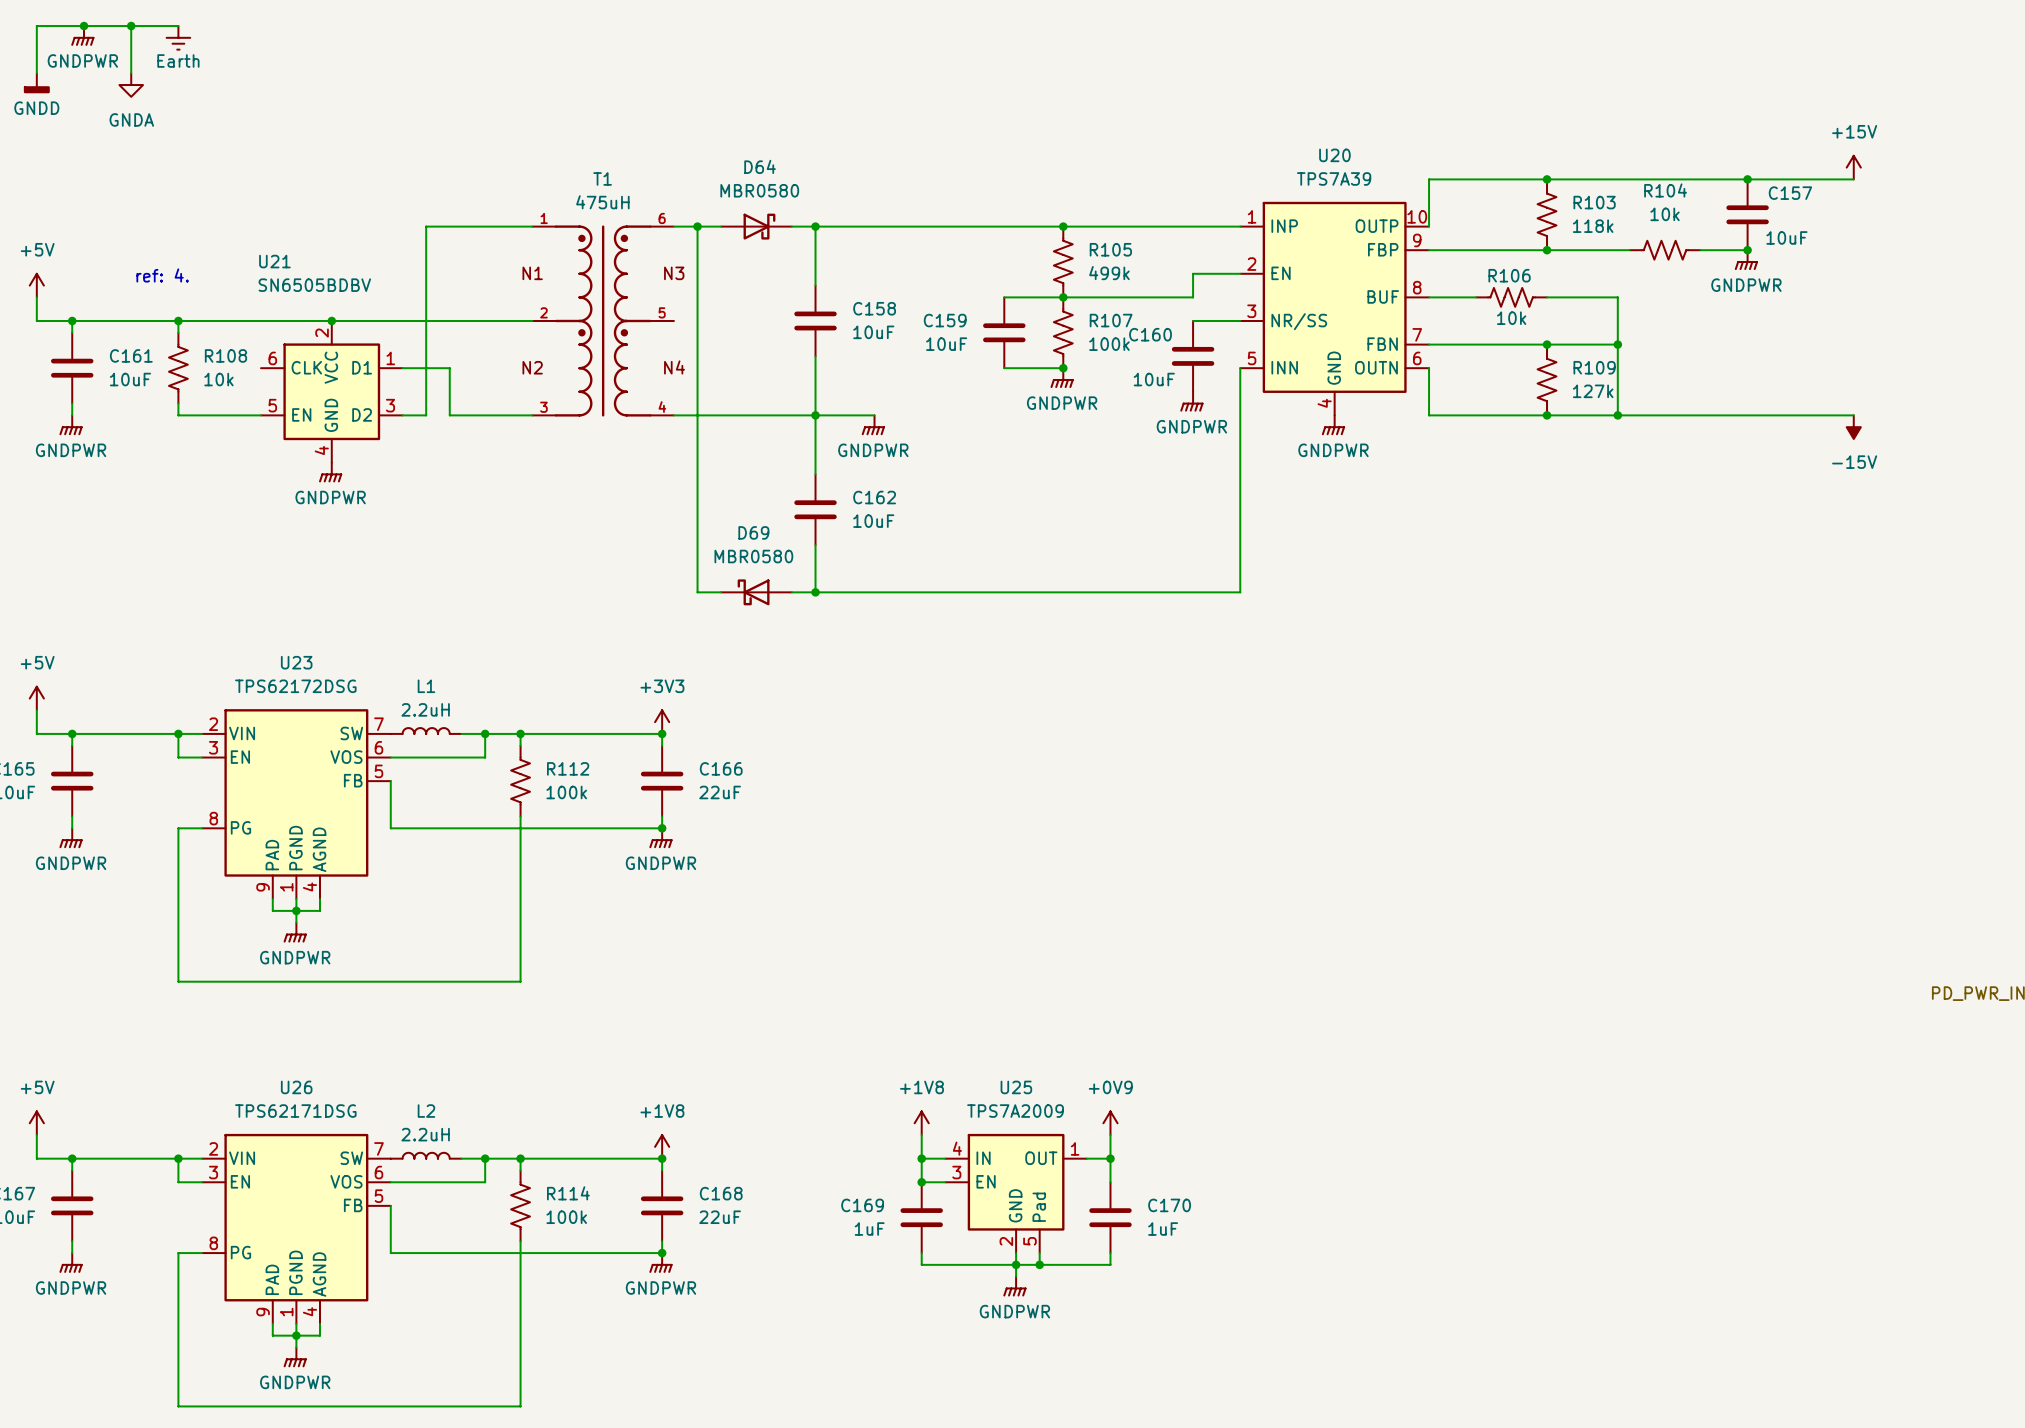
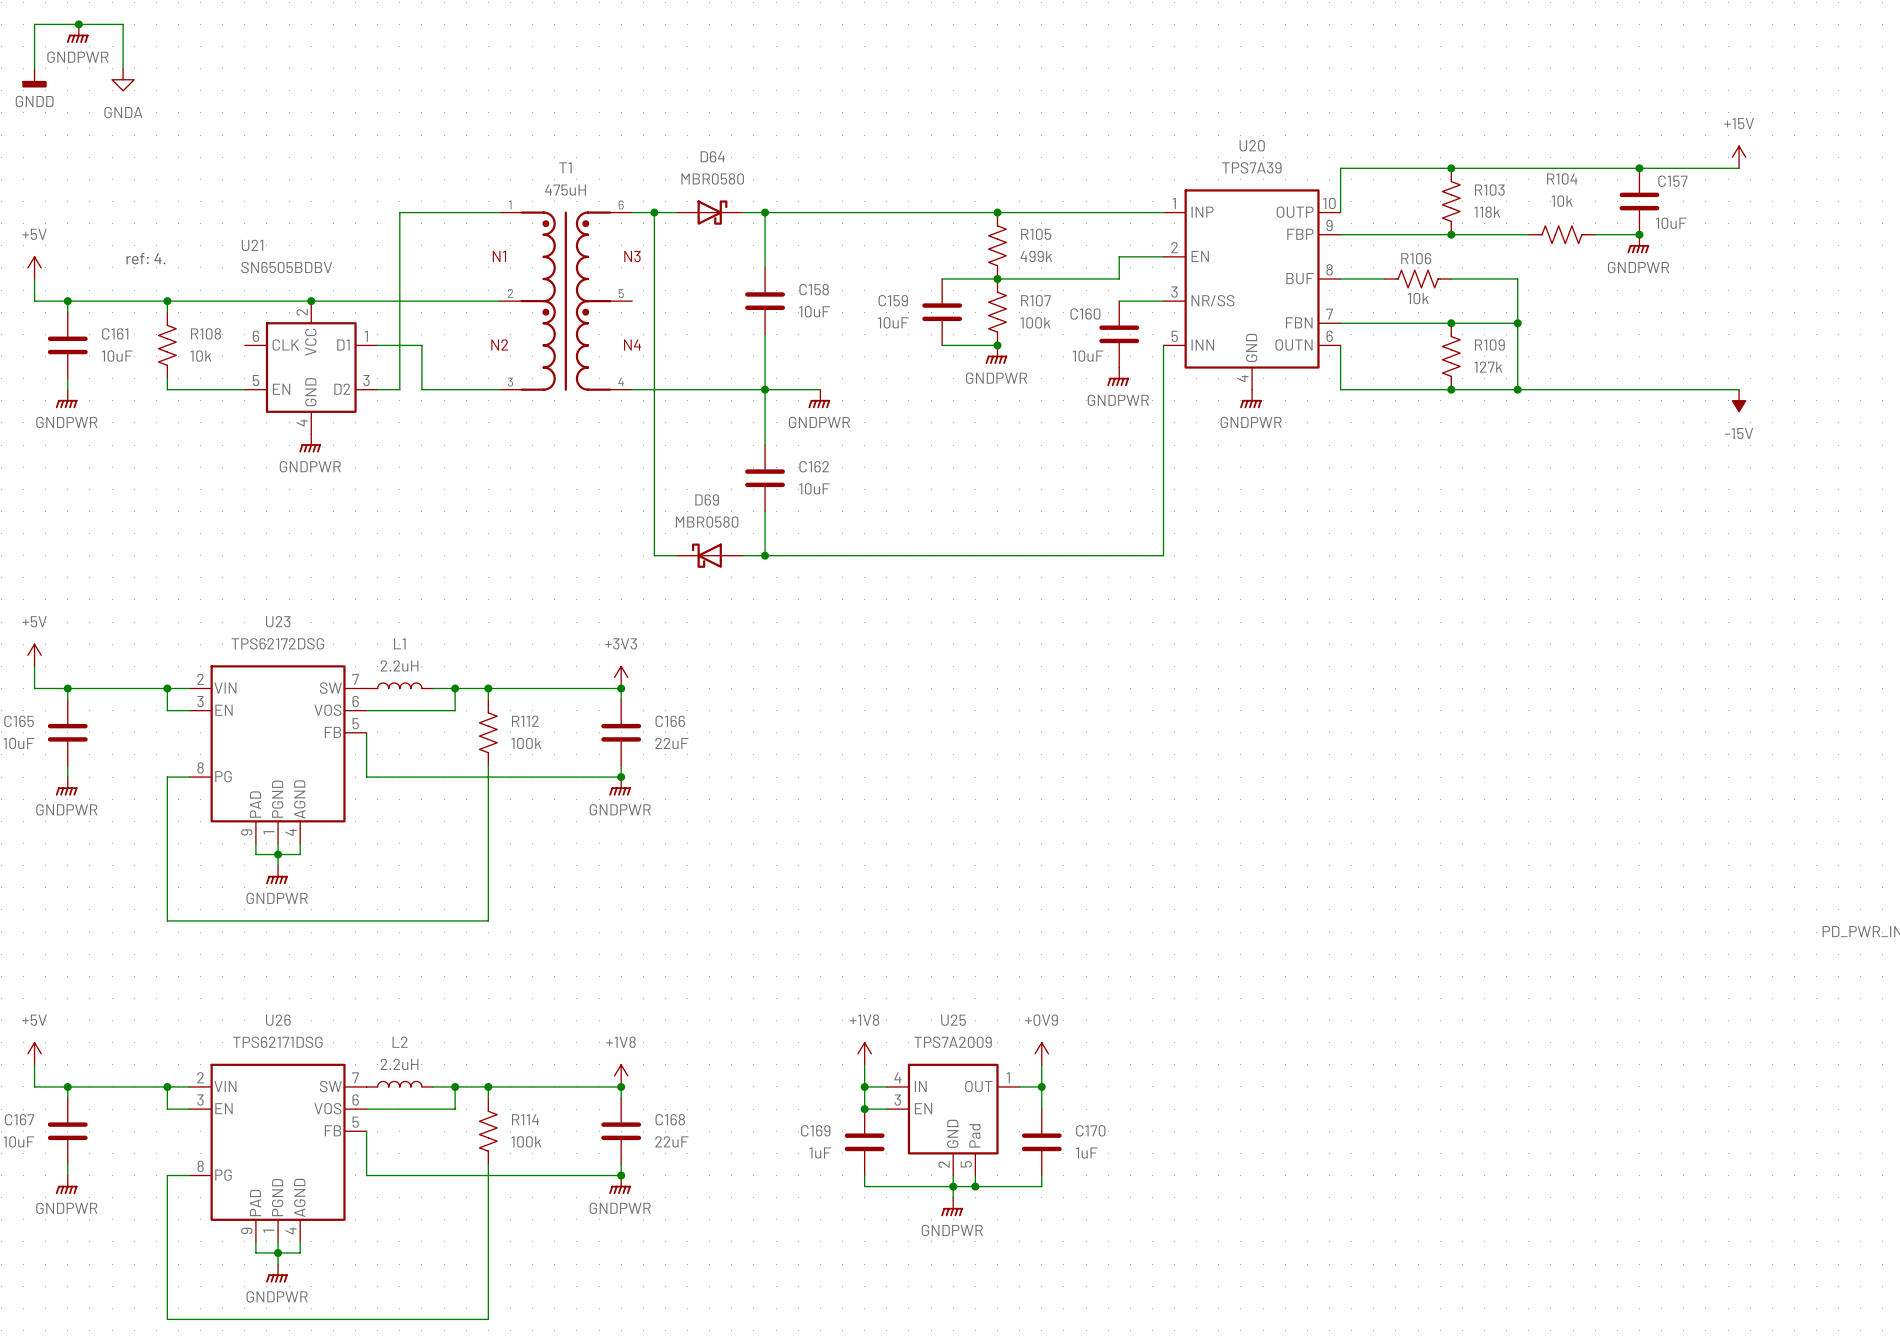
wire: (131, 26) (178, 26) -> none
junction: (131, 26) -> none
power symbol: Earth (178, 37) -> none

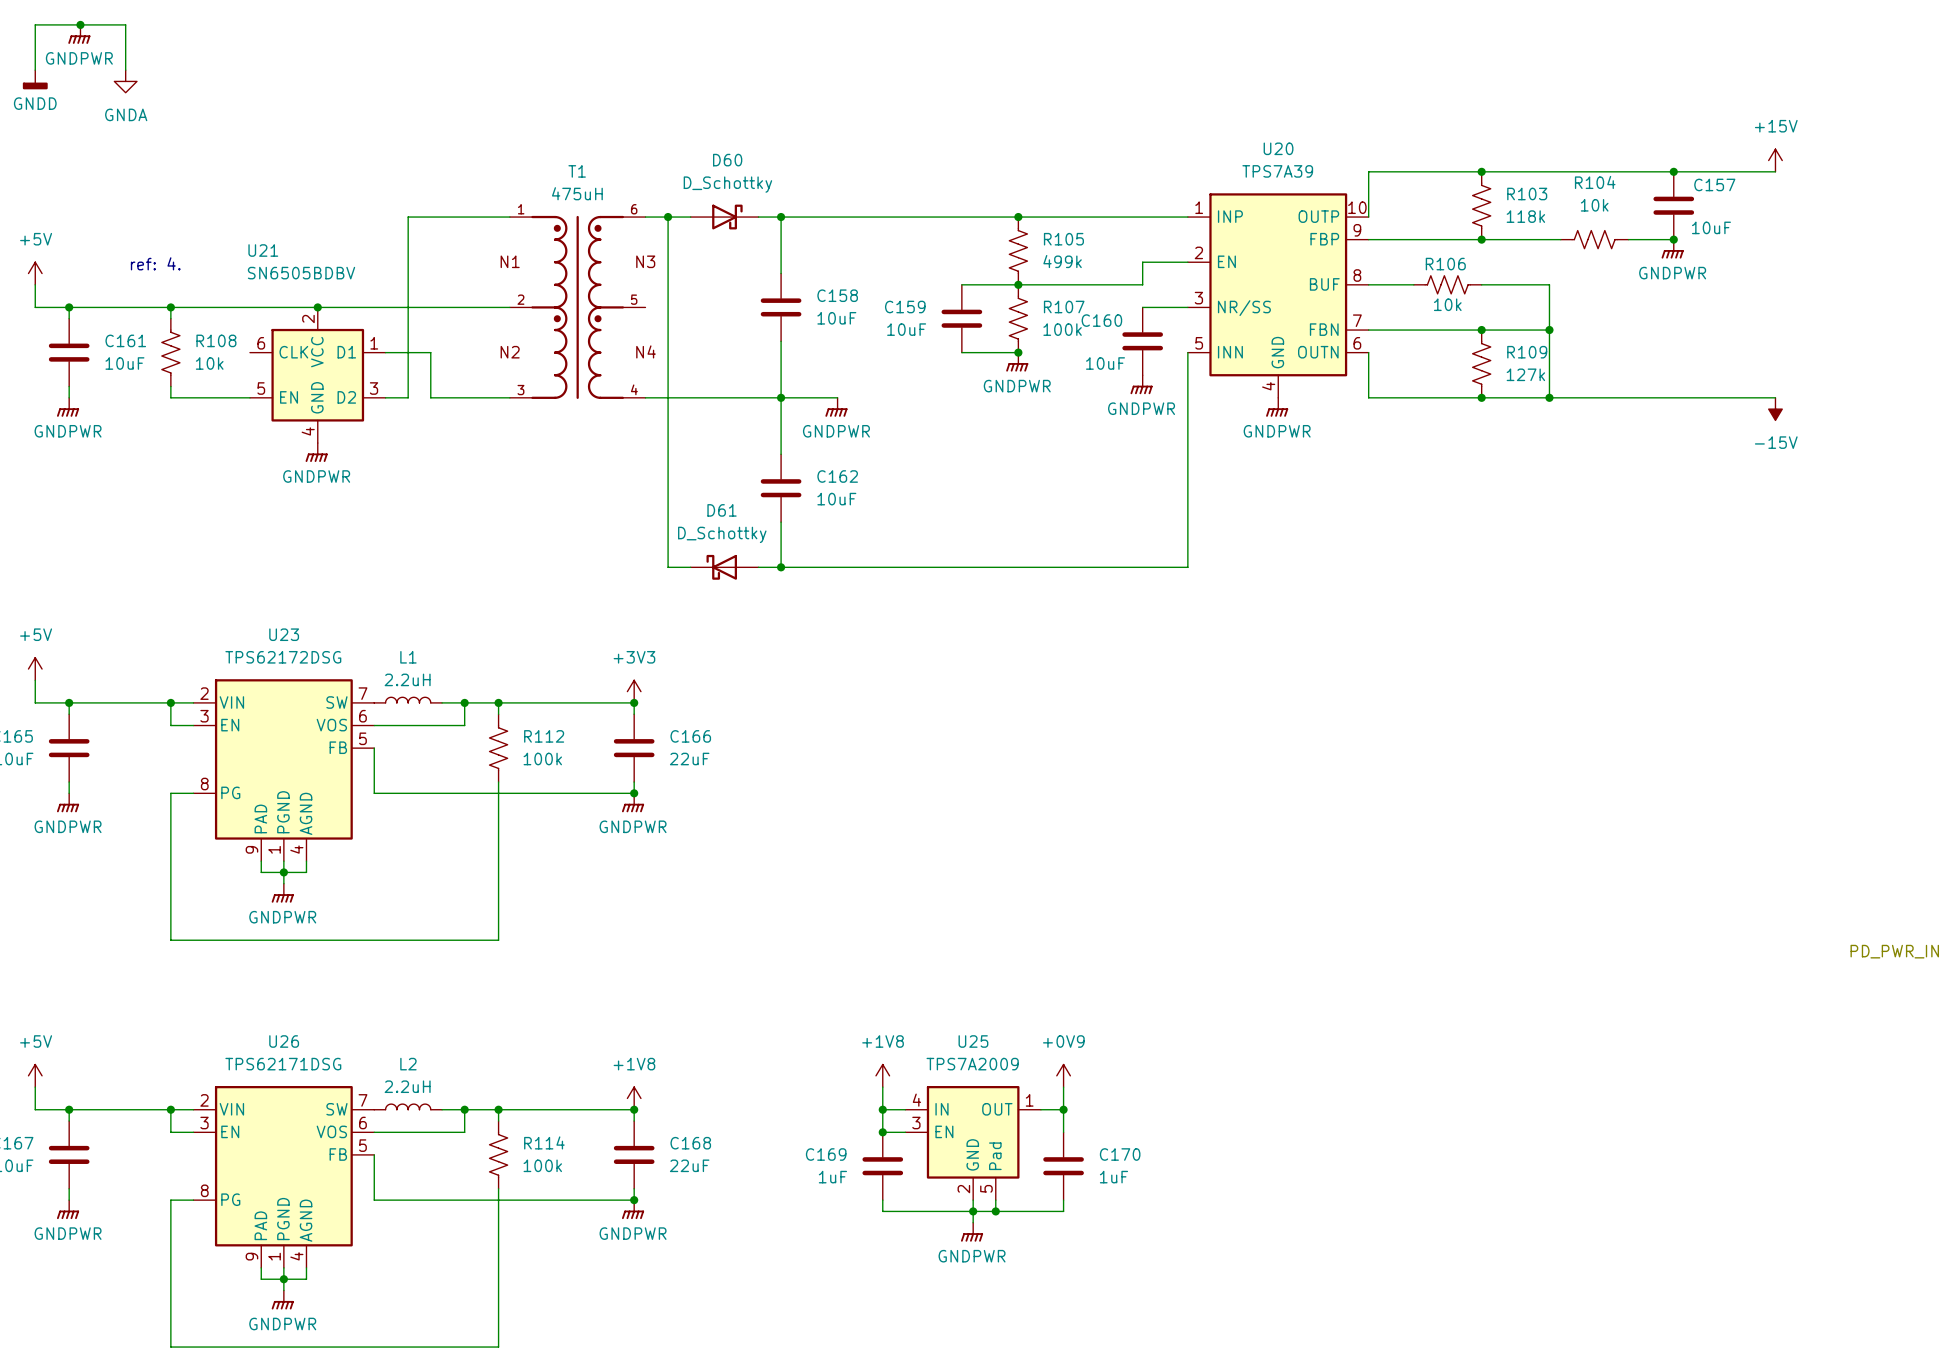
D64 name: D64 (712, 156) -> D60 (727, 160)
D64 value: MBR0580 (712, 178) -> D_Schottky (727, 184)
D69 name: D69 (707, 499) -> D61 (722, 510)
D69 value: MBR0580 (707, 522) -> D_Schottky (722, 534)

